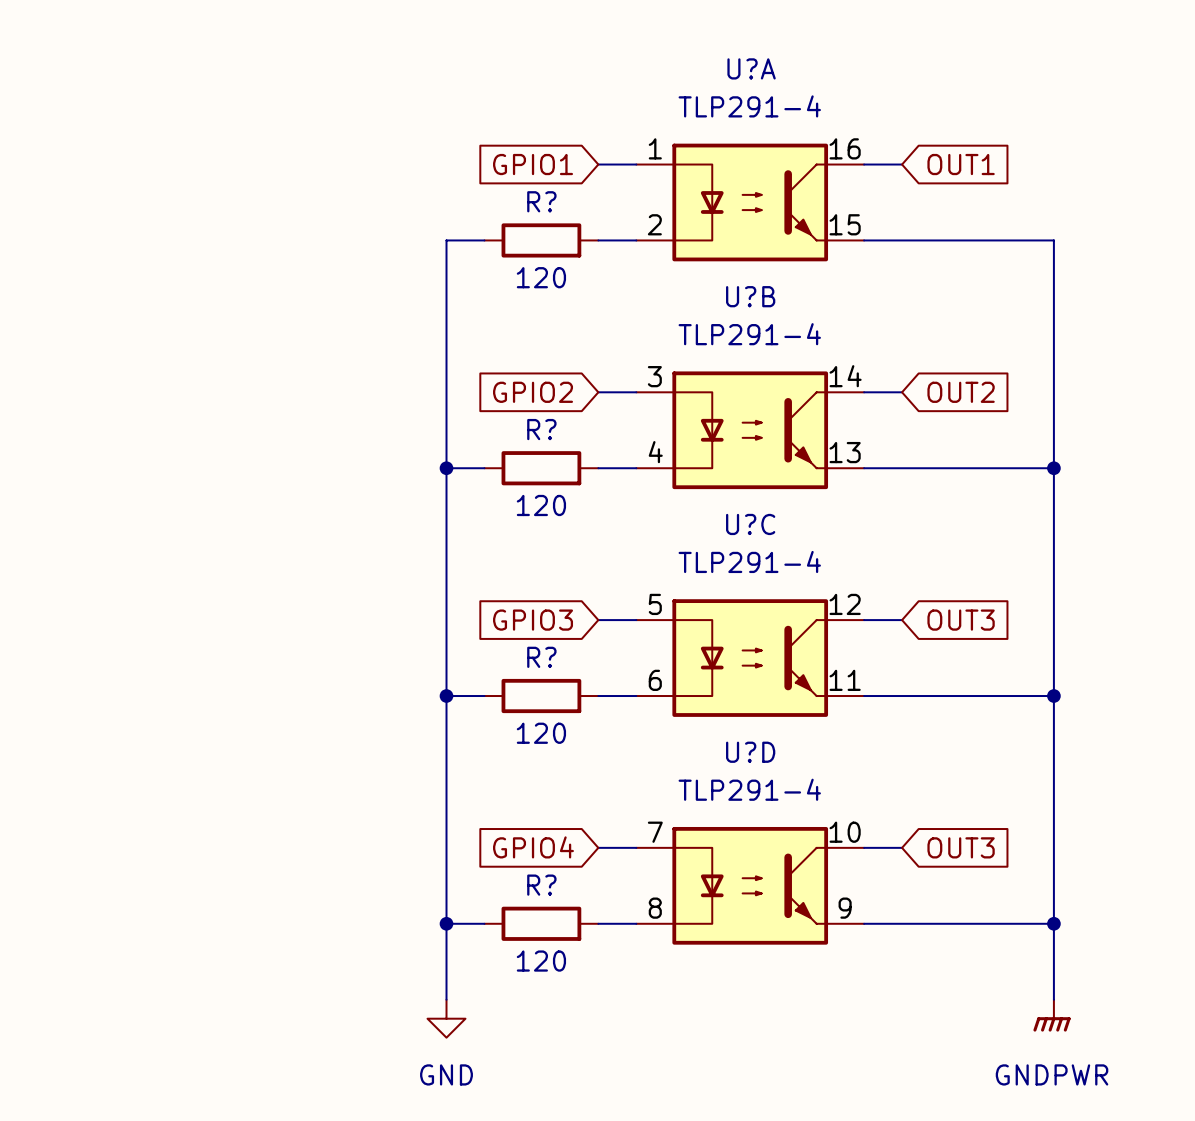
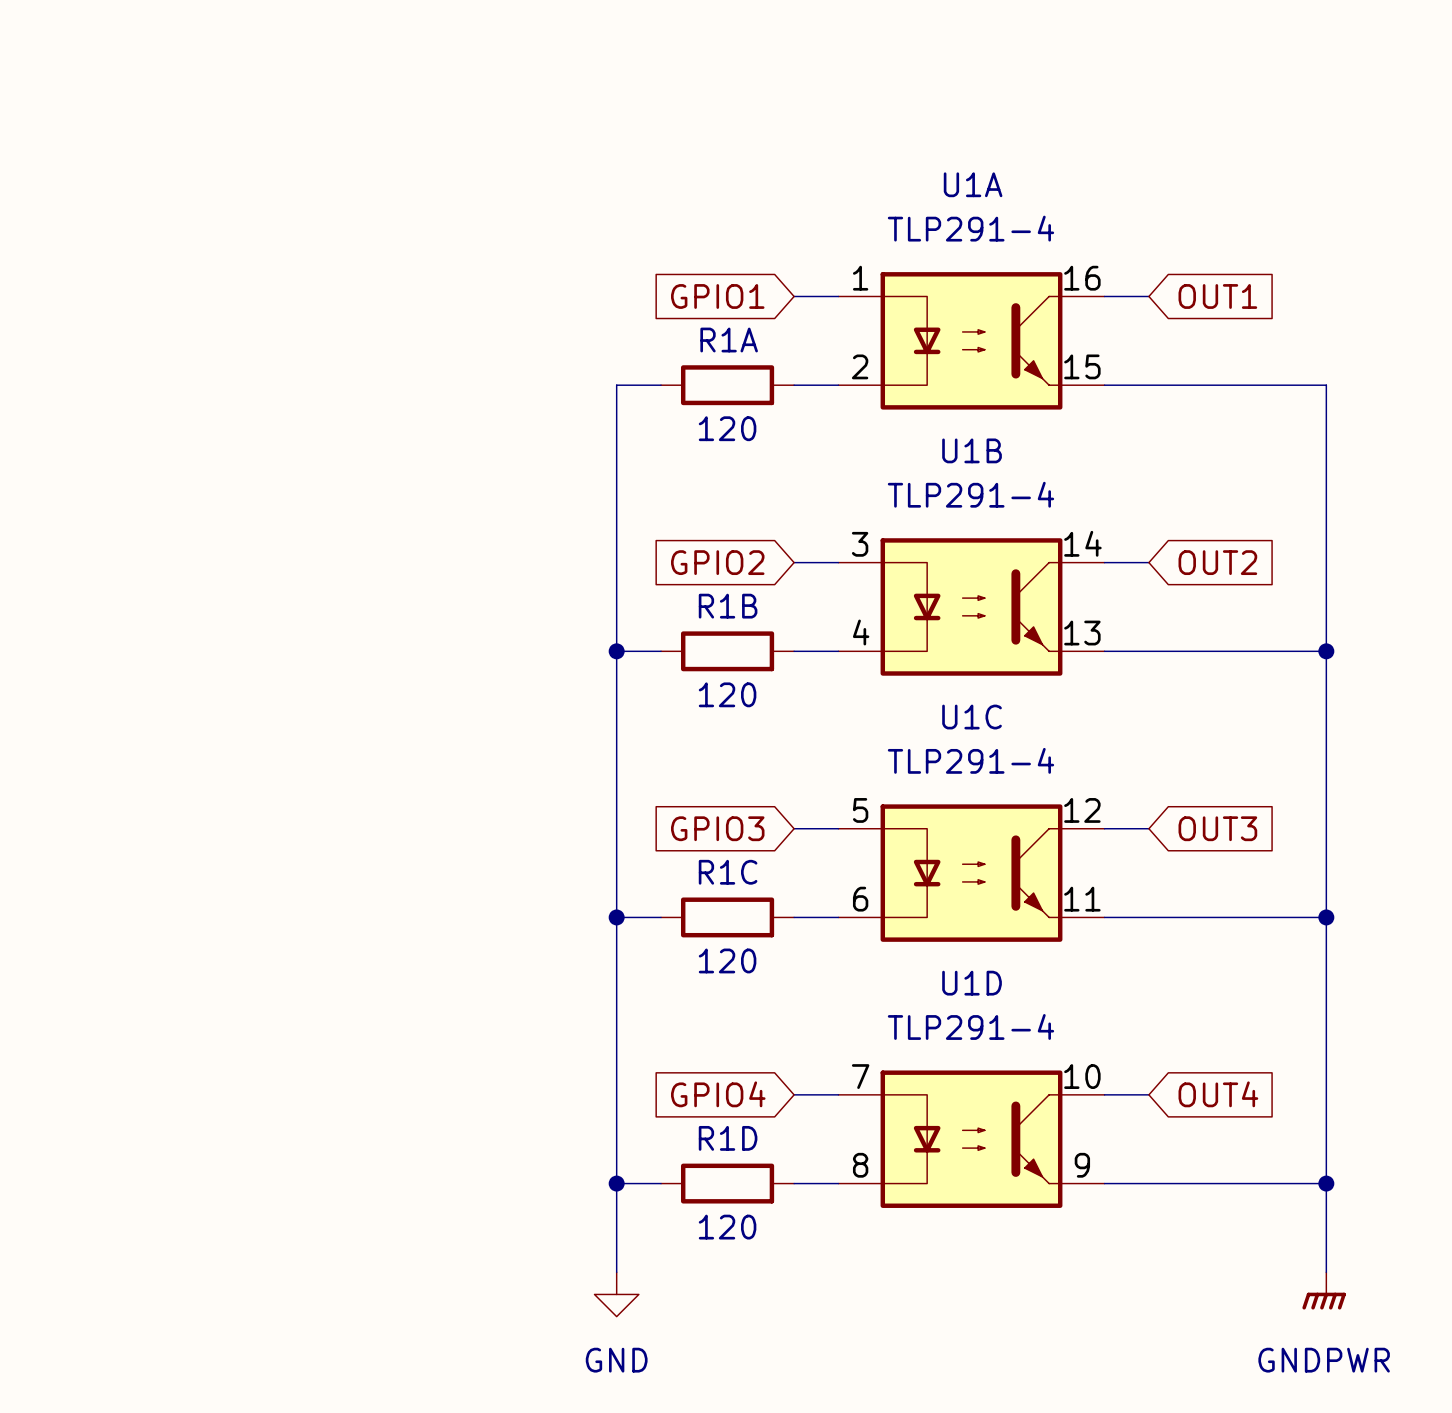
U?A name: U?A (751, 68) -> U1A (973, 184)
R? name: R? (541, 201) -> R1A (729, 340)
U?B name: U?B (750, 296) -> U1B (972, 450)
R? name: R? (541, 429) -> R1B (728, 606)
U?C name: U?C (750, 524) -> U1C (972, 717)
R? name: R? (541, 657) -> R1C (728, 872)
U?D name: U?D (750, 752) -> U1D (972, 983)
global label: OUT3 (961, 847) -> OUT4 (1218, 1094)
R? name: R? (541, 885) -> R1D (728, 1138)

